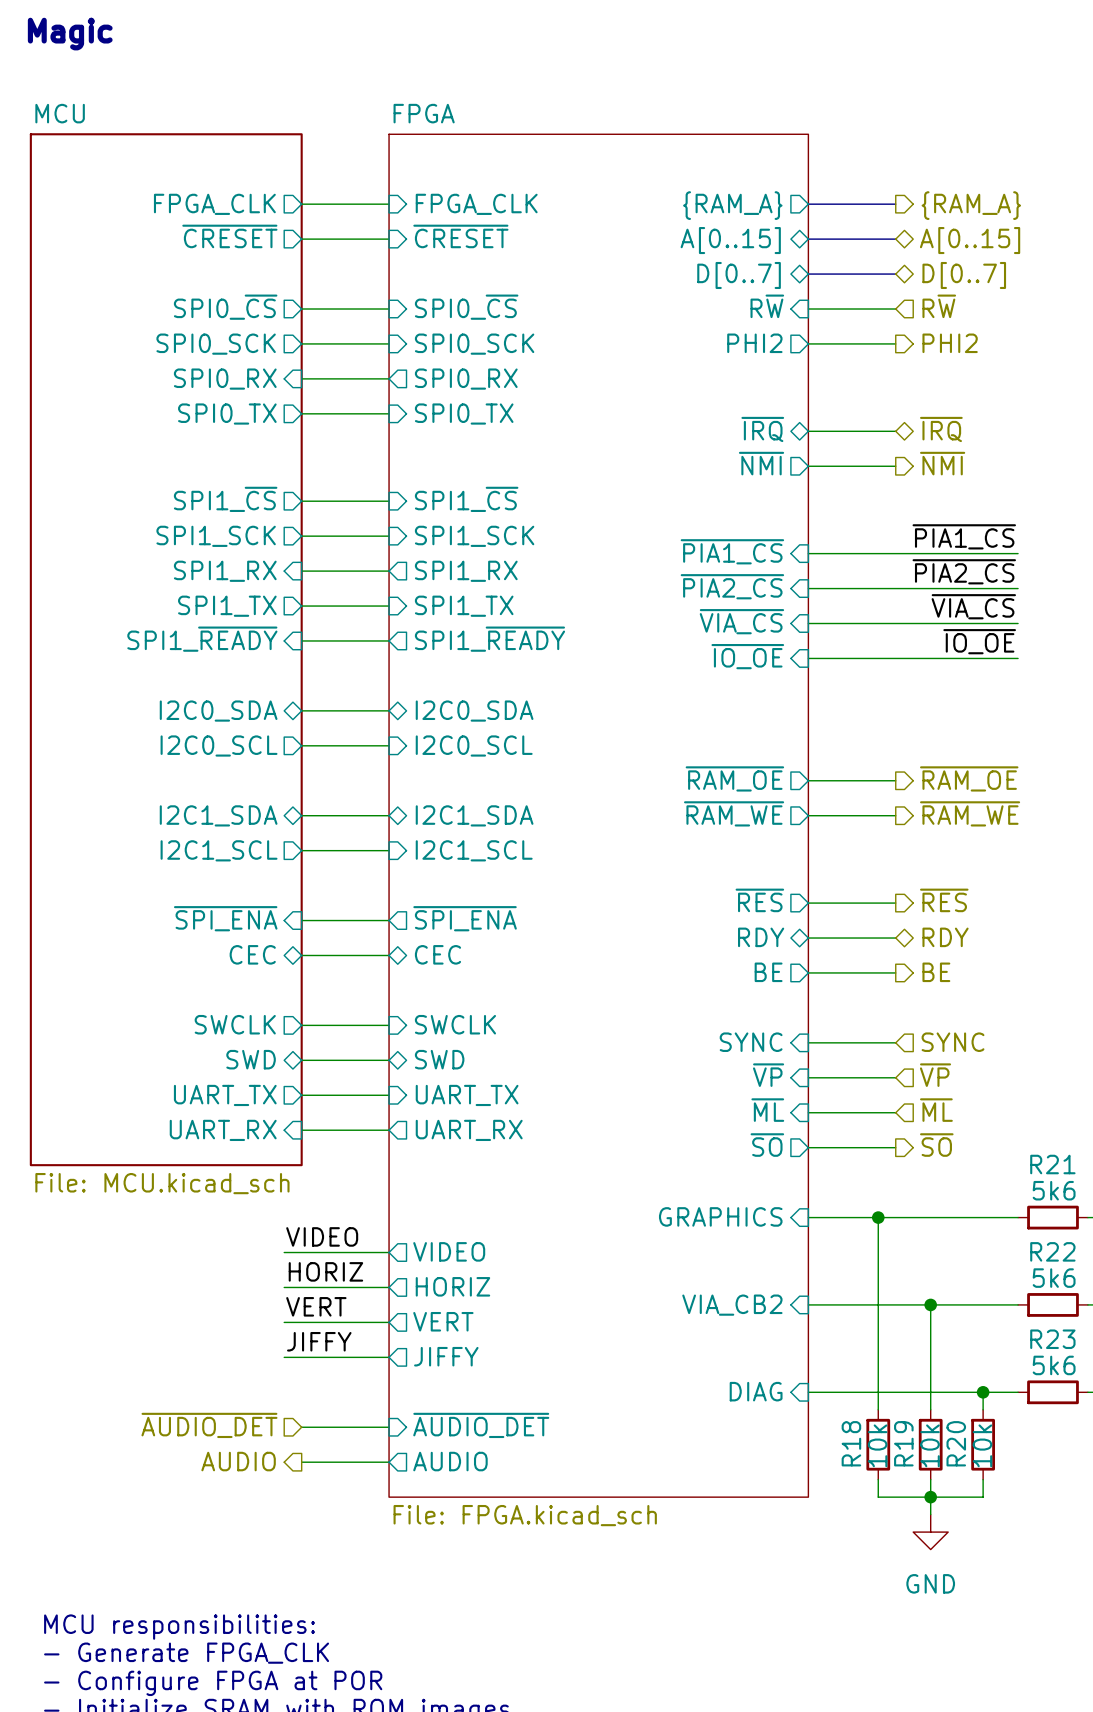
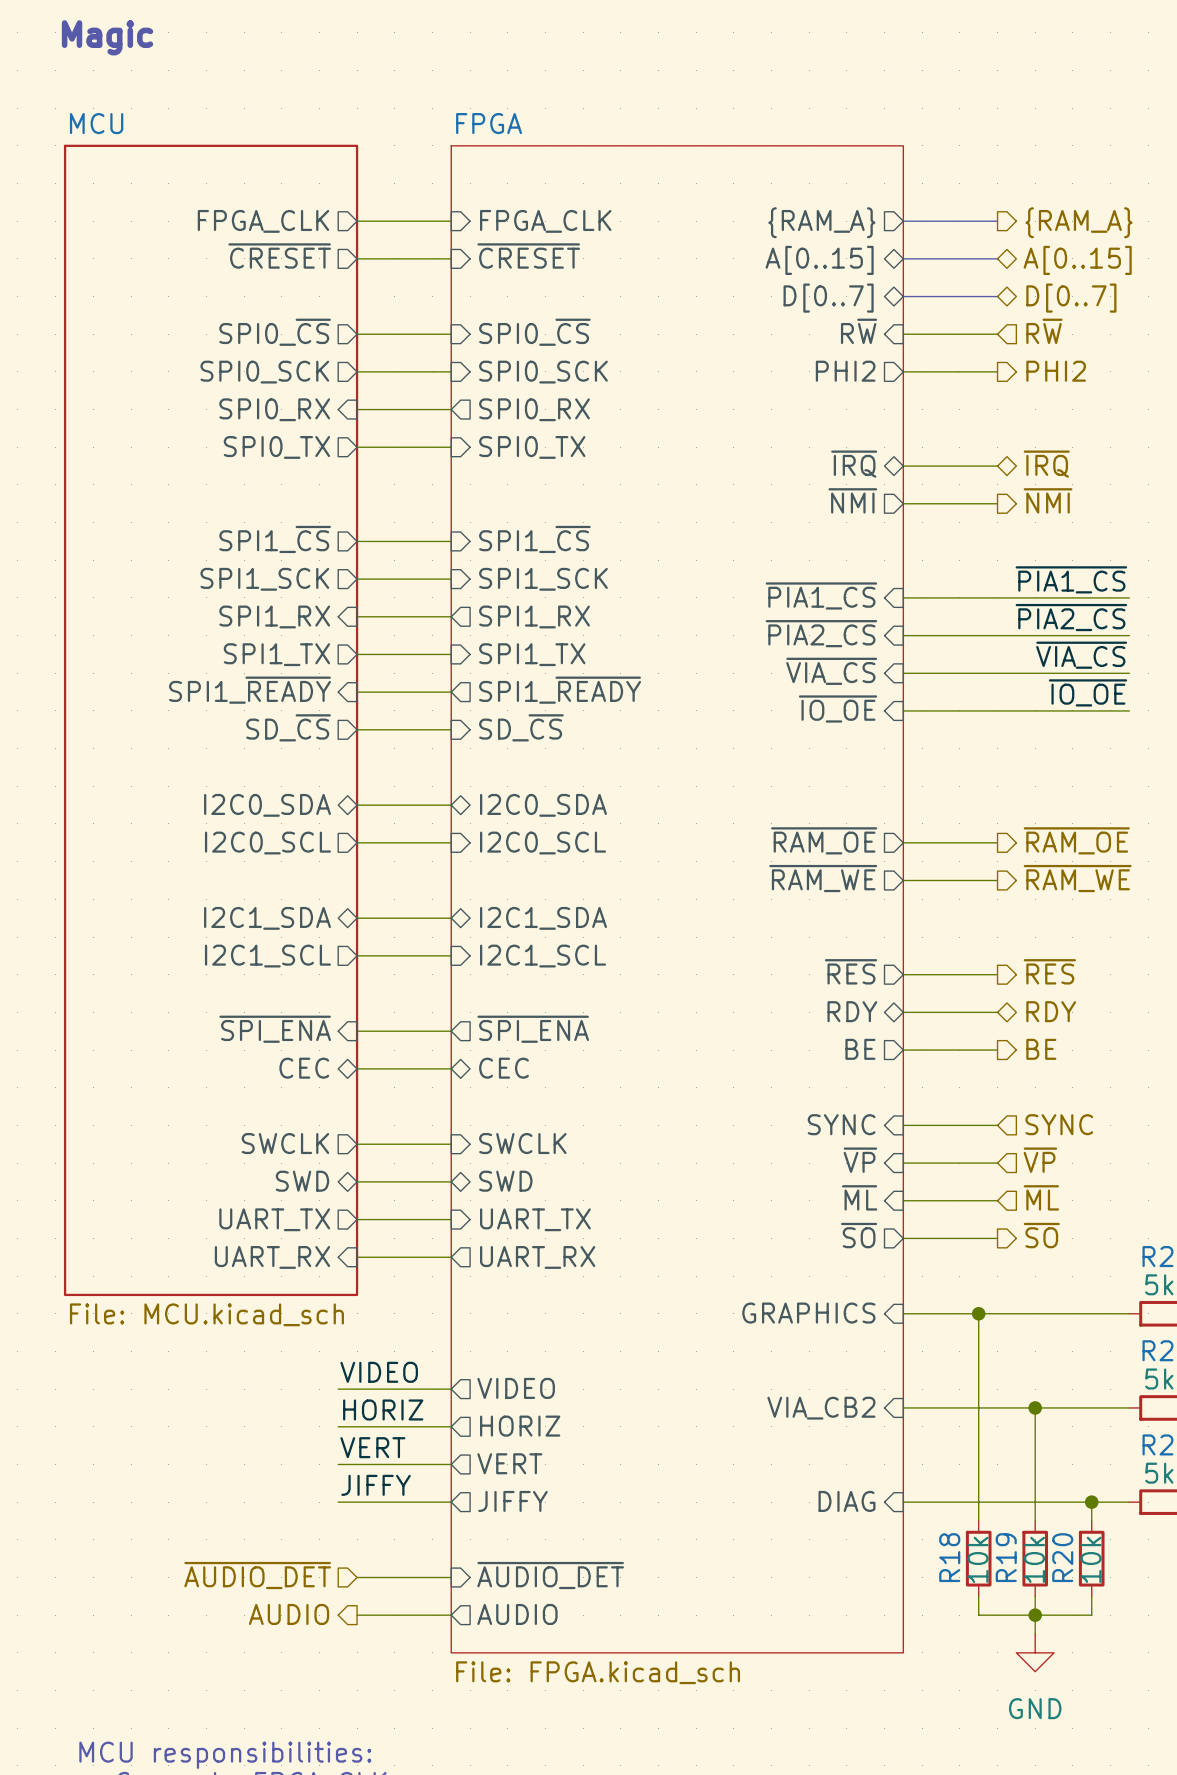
sheet MCU: File: MCU.kicad_sch (166, 649) -> none
sheet MCU: none -> File: MCU.kicad_sch (211, 720)
sheet pin: none -> SD_~{CS} (288, 727)
sheet pin: none -> SD_~{CS} (521, 727)
wire: (301, 710) (389, 710) -> (357, 729) (451, 729)
sheet pin: I2C0_SDA (218, 711) -> none
sheet pin: I2C0_SDA (474, 711) -> none
sheet pin shape: output (219, 745) -> bidirectional (267, 805)
sheet pin: I2C0_SCL (219, 745) -> I2C0_SDA (267, 805)
sheet pin shape: input (474, 745) -> bidirectional (543, 805)
sheet pin: I2C0_SCL (474, 745) -> I2C0_SDA (543, 805)
sheet pin shape: bidirectional (218, 815) -> output (267, 843)
sheet pin: I2C1_SDA (218, 815) -> I2C0_SCL (267, 843)
wire: (301, 815) (389, 815) -> (357, 842) (451, 842)
sheet pin shape: bidirectional (474, 815) -> input (543, 843)
sheet pin: I2C1_SDA (474, 815) -> I2C0_SCL (543, 843)
sheet FPGA: File: FPGA.kicad_sch (598, 815) -> none
sheet FPGA: none -> File: FPGA.kicad_sch (677, 899)
sheet pin shape: output (219, 850) -> bidirectional (267, 918)
sheet pin: I2C1_SCL (219, 850) -> I2C1_SDA (267, 918)
sheet pin shape: input (474, 850) -> bidirectional (543, 918)
sheet pin: I2C1_SCL (474, 850) -> I2C1_SDA (543, 918)
sheet pin: none -> I2C1_SCL (267, 956)
sheet pin: none -> I2C1_SCL (543, 956)
sheet pin: ~{SPI_ENA} (225, 918) -> none
sheet pin: ~{SPI_ENA} (465, 918) -> none
wire: (301, 920) (389, 920) -> (357, 955) (451, 955)
sheet pin shape: bidirectional (252, 954) -> input (275, 1029)
sheet pin: CEC (252, 954) -> ~{SPI_ENA} (275, 1029)
sheet pin shape: bidirectional (437, 954) -> output (533, 1029)
sheet pin: CEC (437, 954) -> ~{SPI_ENA} (533, 1029)
sheet pin: none -> CEC (304, 1068)
sheet pin: none -> CEC (504, 1068)
sheet pin: SWCLK (235, 1024) -> none
sheet pin: SWCLK (455, 1024) -> none
wire: (301, 1025) (389, 1025) -> (357, 1068) (451, 1068)
sheet pin shape: bidirectional (251, 1059) -> output (285, 1143)
sheet pin: SWD (251, 1059) -> SWCLK (285, 1143)
sheet pin shape: bidirectional (439, 1059) -> input (522, 1143)
sheet pin: SWD (439, 1059) -> SWCLK (522, 1143)
sheet pin shape: output (225, 1095) -> bidirectional (302, 1181)
sheet pin: UART_TX (225, 1095) -> SWD (302, 1181)
sheet pin shape: input (467, 1095) -> bidirectional (505, 1181)
sheet pin: UART_TX (467, 1095) -> SWD (505, 1181)
sheet pin shape: input (223, 1130) -> output (274, 1219)
sheet pin: UART_RX (223, 1130) -> UART_TX (274, 1219)
sheet pin shape: output (469, 1130) -> input (535, 1219)
sheet pin: UART_RX (469, 1130) -> UART_TX (535, 1219)
sheet pin: none -> UART_RX (272, 1257)
wire: none -> (357, 1257) (451, 1257)
sheet pin: none -> UART_RX (537, 1257)
label: VIDEO (322, 1236) -> none
sheet pin: VIDEO (449, 1251) -> none
wire: (284, 1252) (389, 1252) -> (338, 1502) (451, 1502)
label: HORIZ (325, 1271) -> VIDEO (379, 1372)
sheet pin: HORIZ (452, 1286) -> VIDEO (516, 1388)
label: VERT (316, 1306) -> HORIZ (383, 1409)
sheet pin: VERT (443, 1321) -> HORIZ (520, 1426)
label: JIFFY (319, 1341) -> VERT (372, 1447)
sheet pin: JIFFY (446, 1356) -> VERT (509, 1463)
label: none -> JIFFY (376, 1485)
sheet pin: none -> JIFFY (512, 1501)
hierarchical label: ~{AUDIO_DET} (209, 1425) -> none
sheet pin: ~{AUDIO_DET} (481, 1425) -> none
wire: (301, 1427) (389, 1427) -> (357, 1615) (451, 1615)
hierarchical label shape: output (238, 1461) -> input (257, 1575)
hierarchical label: AUDIO (238, 1461) -> ~{AUDIO_DET} (257, 1575)
sheet pin shape: output (450, 1461) -> input (550, 1575)
sheet pin: AUDIO (450, 1461) -> ~{AUDIO_DET} (550, 1575)
hierarchical label: none -> AUDIO (289, 1614)
sheet pin: none -> AUDIO (517, 1614)

